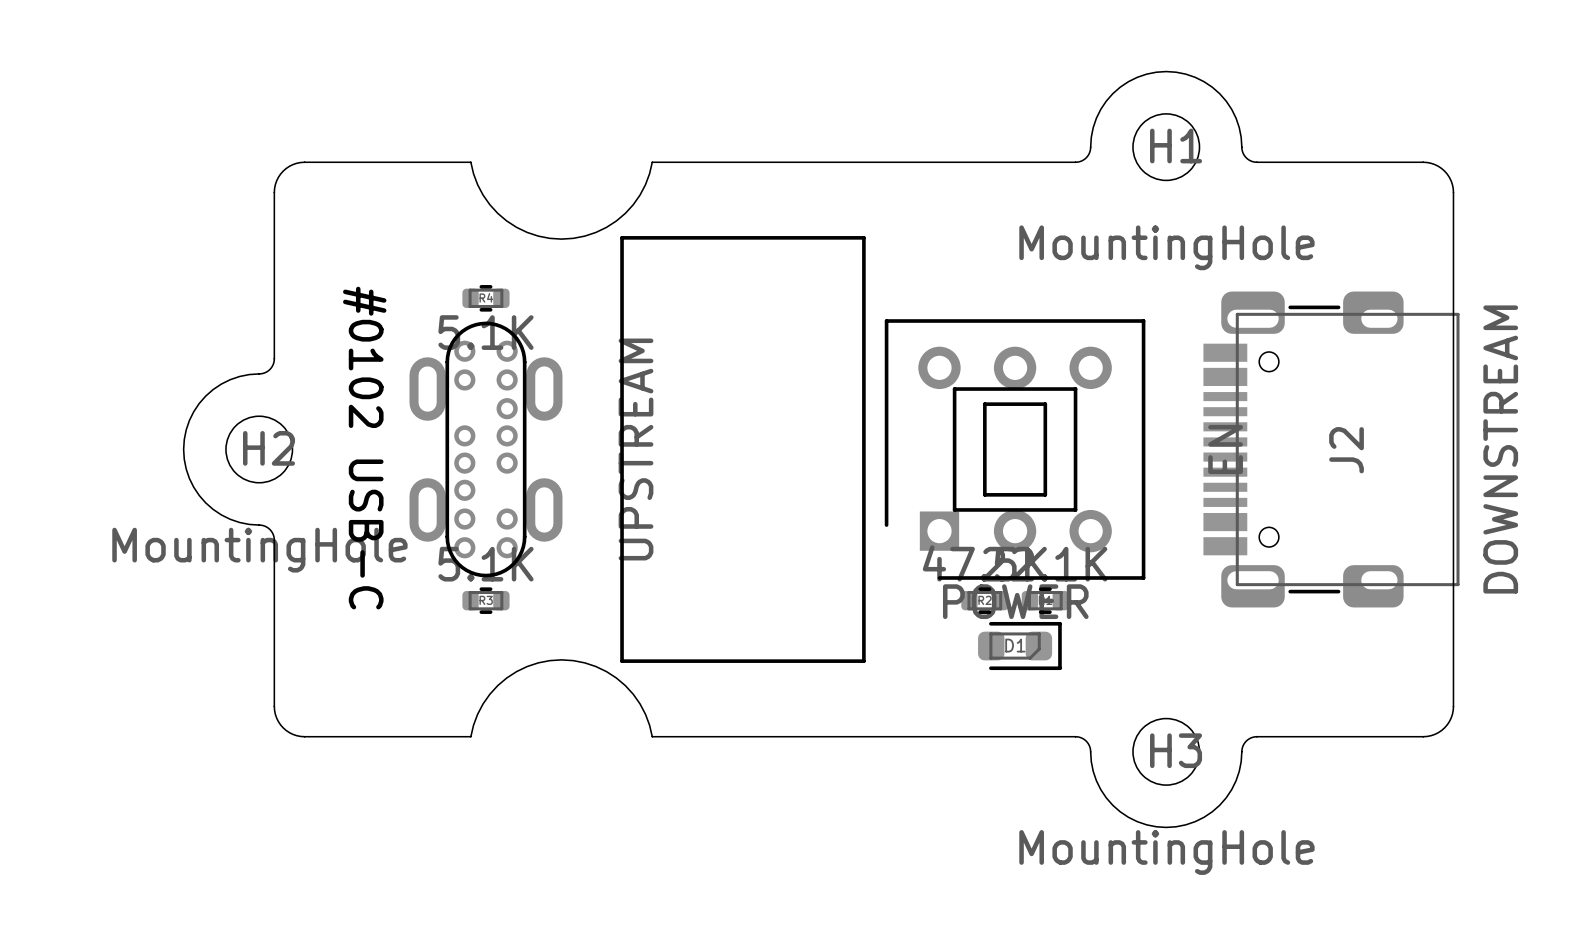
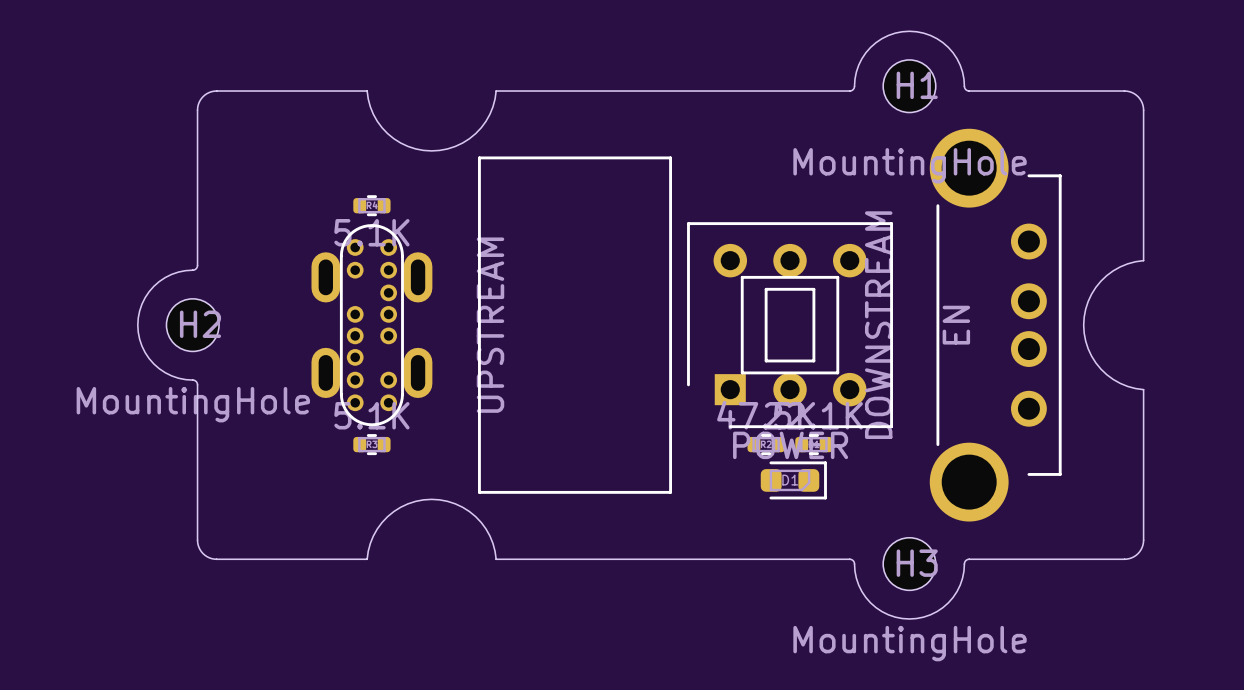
board edge: (1090, 147) (1086, 157) (1075, 162) (652, 162) (640, 195) (616, 220) (584, 236) (561, 239) (527, 232) (497, 213) (477, 184) (470, 162) (304, 162) (293, 164) (286, 168) (278, 177) (274, 188) (273, 364) (265, 372) (230, 379) (205, 396) (189, 420) (183, 449) (189, 478) (205, 502) (230, 519) (265, 526) (273, 534) (274, 706) (276, 718) (280, 724) (293, 734) (304, 736) (470, 736) (483, 703) (506, 678) (538, 662) (573, 660) (595, 666) (625, 685) (645, 714) (652, 736) (1079, 737) (1084, 739) (1089, 746) (1096, 780) (1112, 805) (1137, 821) (1166, 827) (1195, 821) (1219, 805) (1236, 780) (1242, 746) (1251, 737) (1423, 736) (1434, 734) (1441, 730) (1449, 721) (1453, 706) (1453, 192) (1449, 177) (1441, 168) (1427, 162) (1251, 161) (1242, 152) (1239, 127) (1226, 101) (1204, 81) (1176, 72) (1146, 74) (1120, 87) (1100, 109) (1093, 127) (1090, 147) -> (854, 86) (858, 65) (870, 47) (888, 35) (909, 31) (930, 35) (948, 47) (960, 65) (964, 87) (967, 90) (1124, 91) (1134, 93) (1141, 100) (1143, 110) (1143, 260) (1120, 266) (1100, 281) (1088, 301) (1083, 325) (1088, 348) (1100, 369) (1120, 383) (1143, 389) (1143, 540) (1142, 547) (1136, 555) (1124, 559) (967, 559) (964, 562) (960, 585) (948, 602) (930, 614) (909, 618) (888, 614) (870, 602) (858, 585) (854, 562) (850, 559) (496, 559) (492, 543) (481, 522) (462, 507) (439, 499) (415, 501) (400, 507) (387, 516) (373, 536) (367, 559) (216, 559) (207, 556) (201, 551) (197, 540) (197, 383) (193, 380) (171, 375) (153, 363) (141, 346) (137, 325) (141, 304) (153, 286) (171, 274) (193, 270) (197, 266) (197, 110) (200, 100) (205, 94) (216, 91) (367, 91) (373, 114) (387, 133) (408, 146) (431, 150) (455, 146) (475, 133) (489, 114) (496, 91) (849, 91) (854, 86)
text: #0102 USB-C (364, 448) -> none
part: none -> DOWNSTREAM (995, 325)
J2: DOWNSTREAM (1331, 449) -> none

